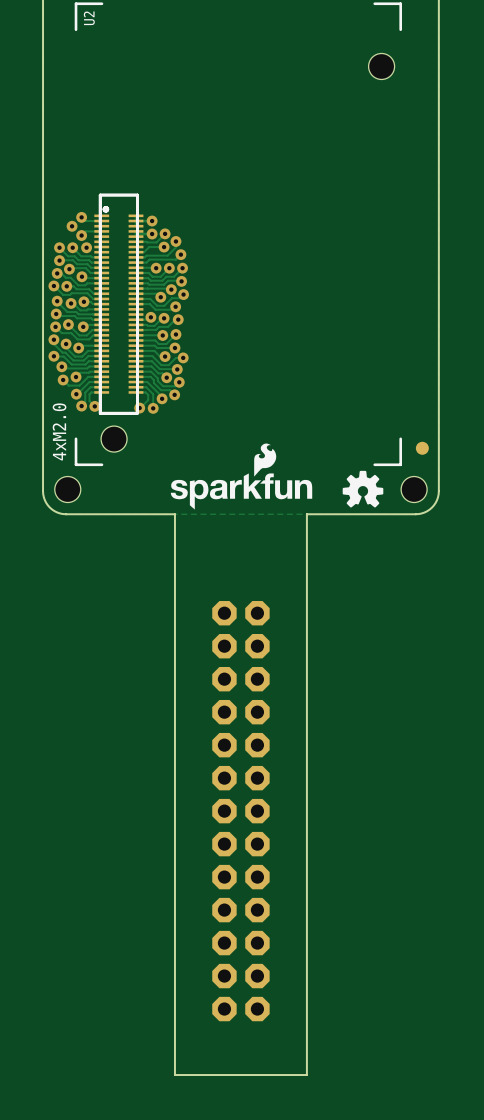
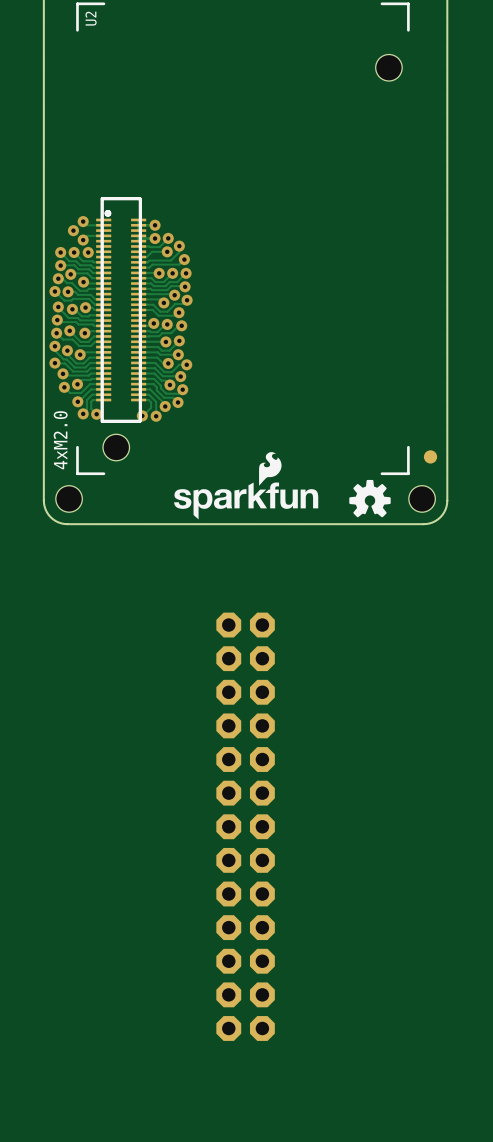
board edge: (306, 514) (306, 1075) (174, 1075) (174, 514) -> (312, 524) (178, 524)

